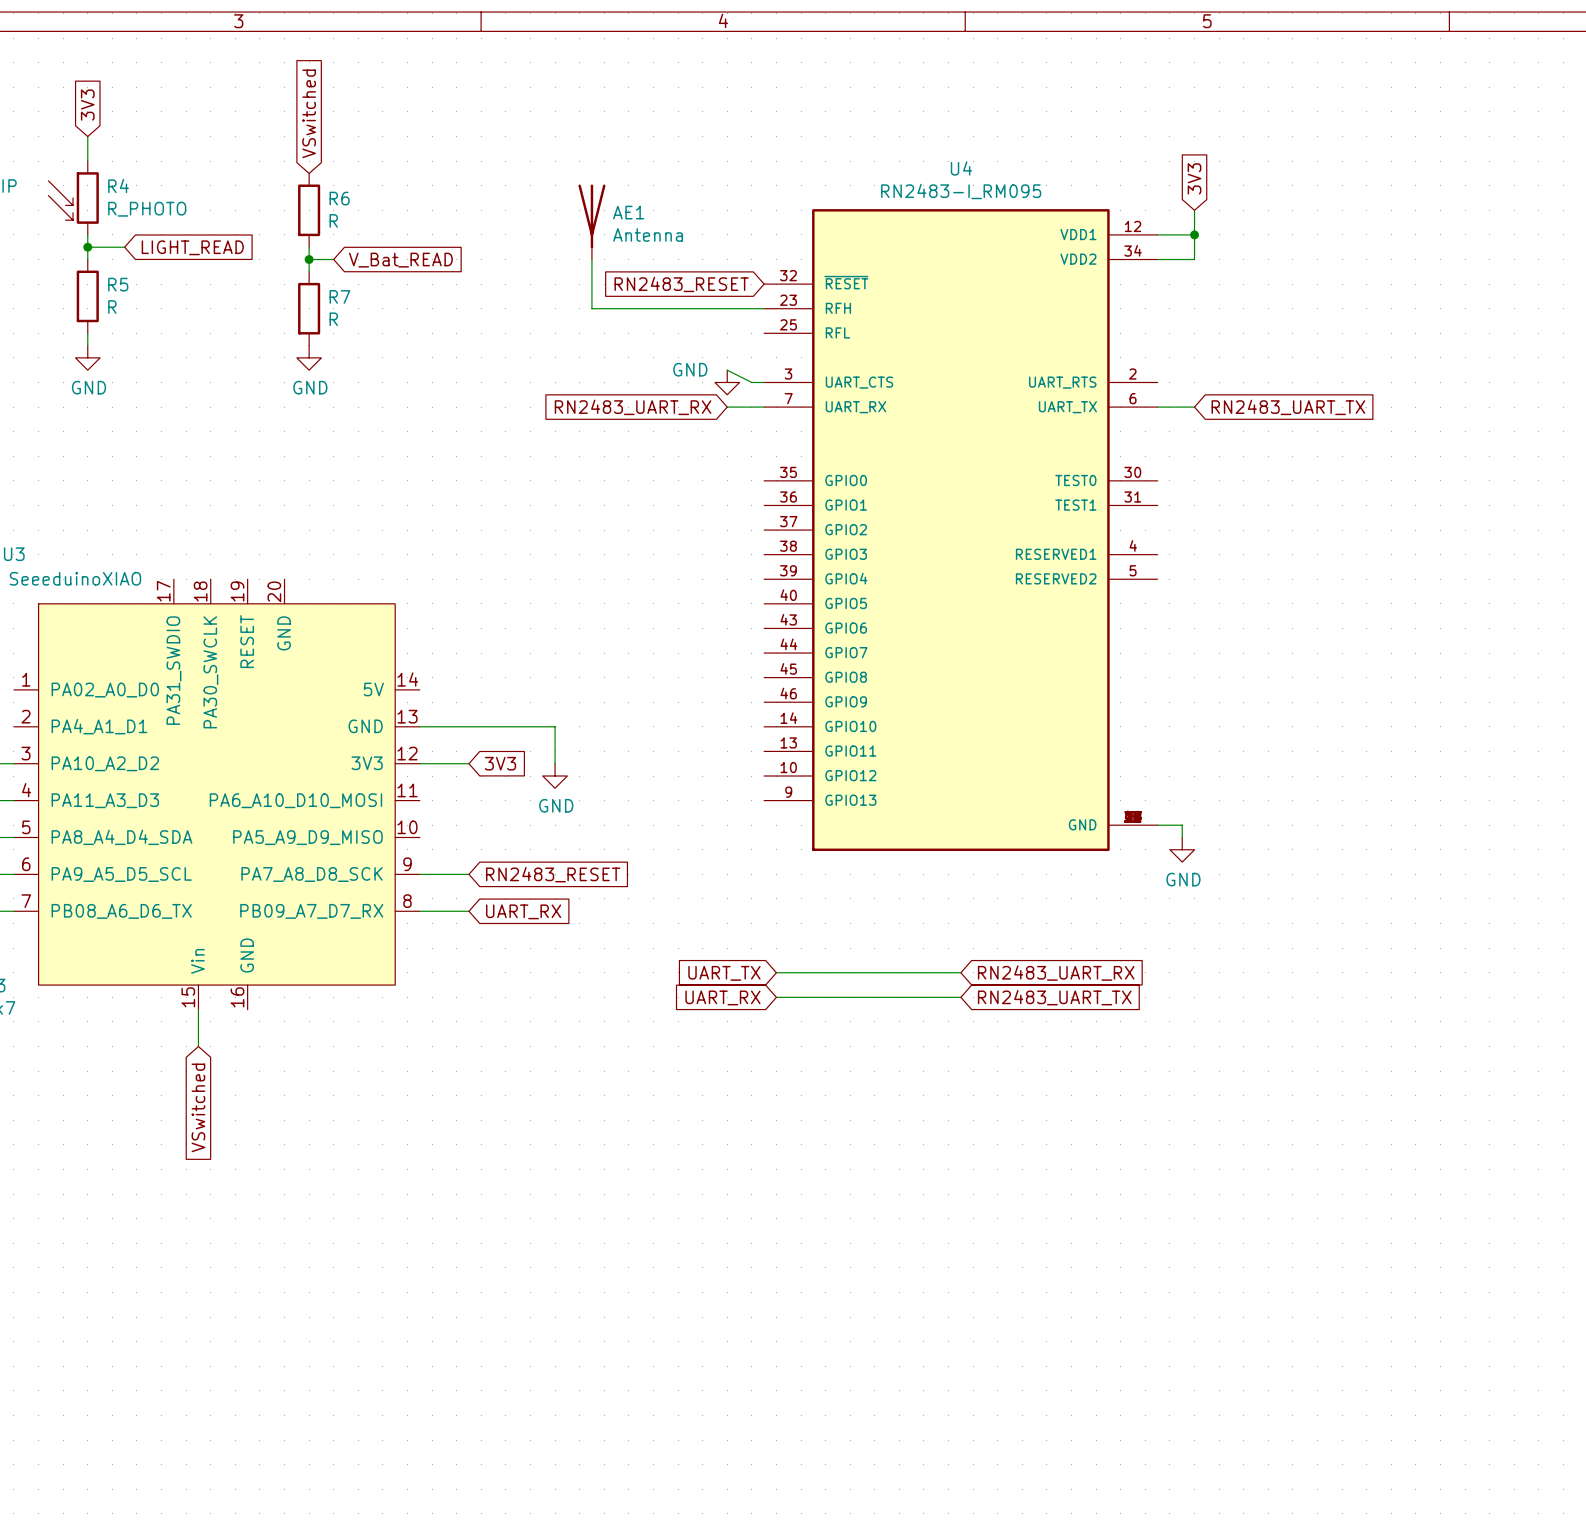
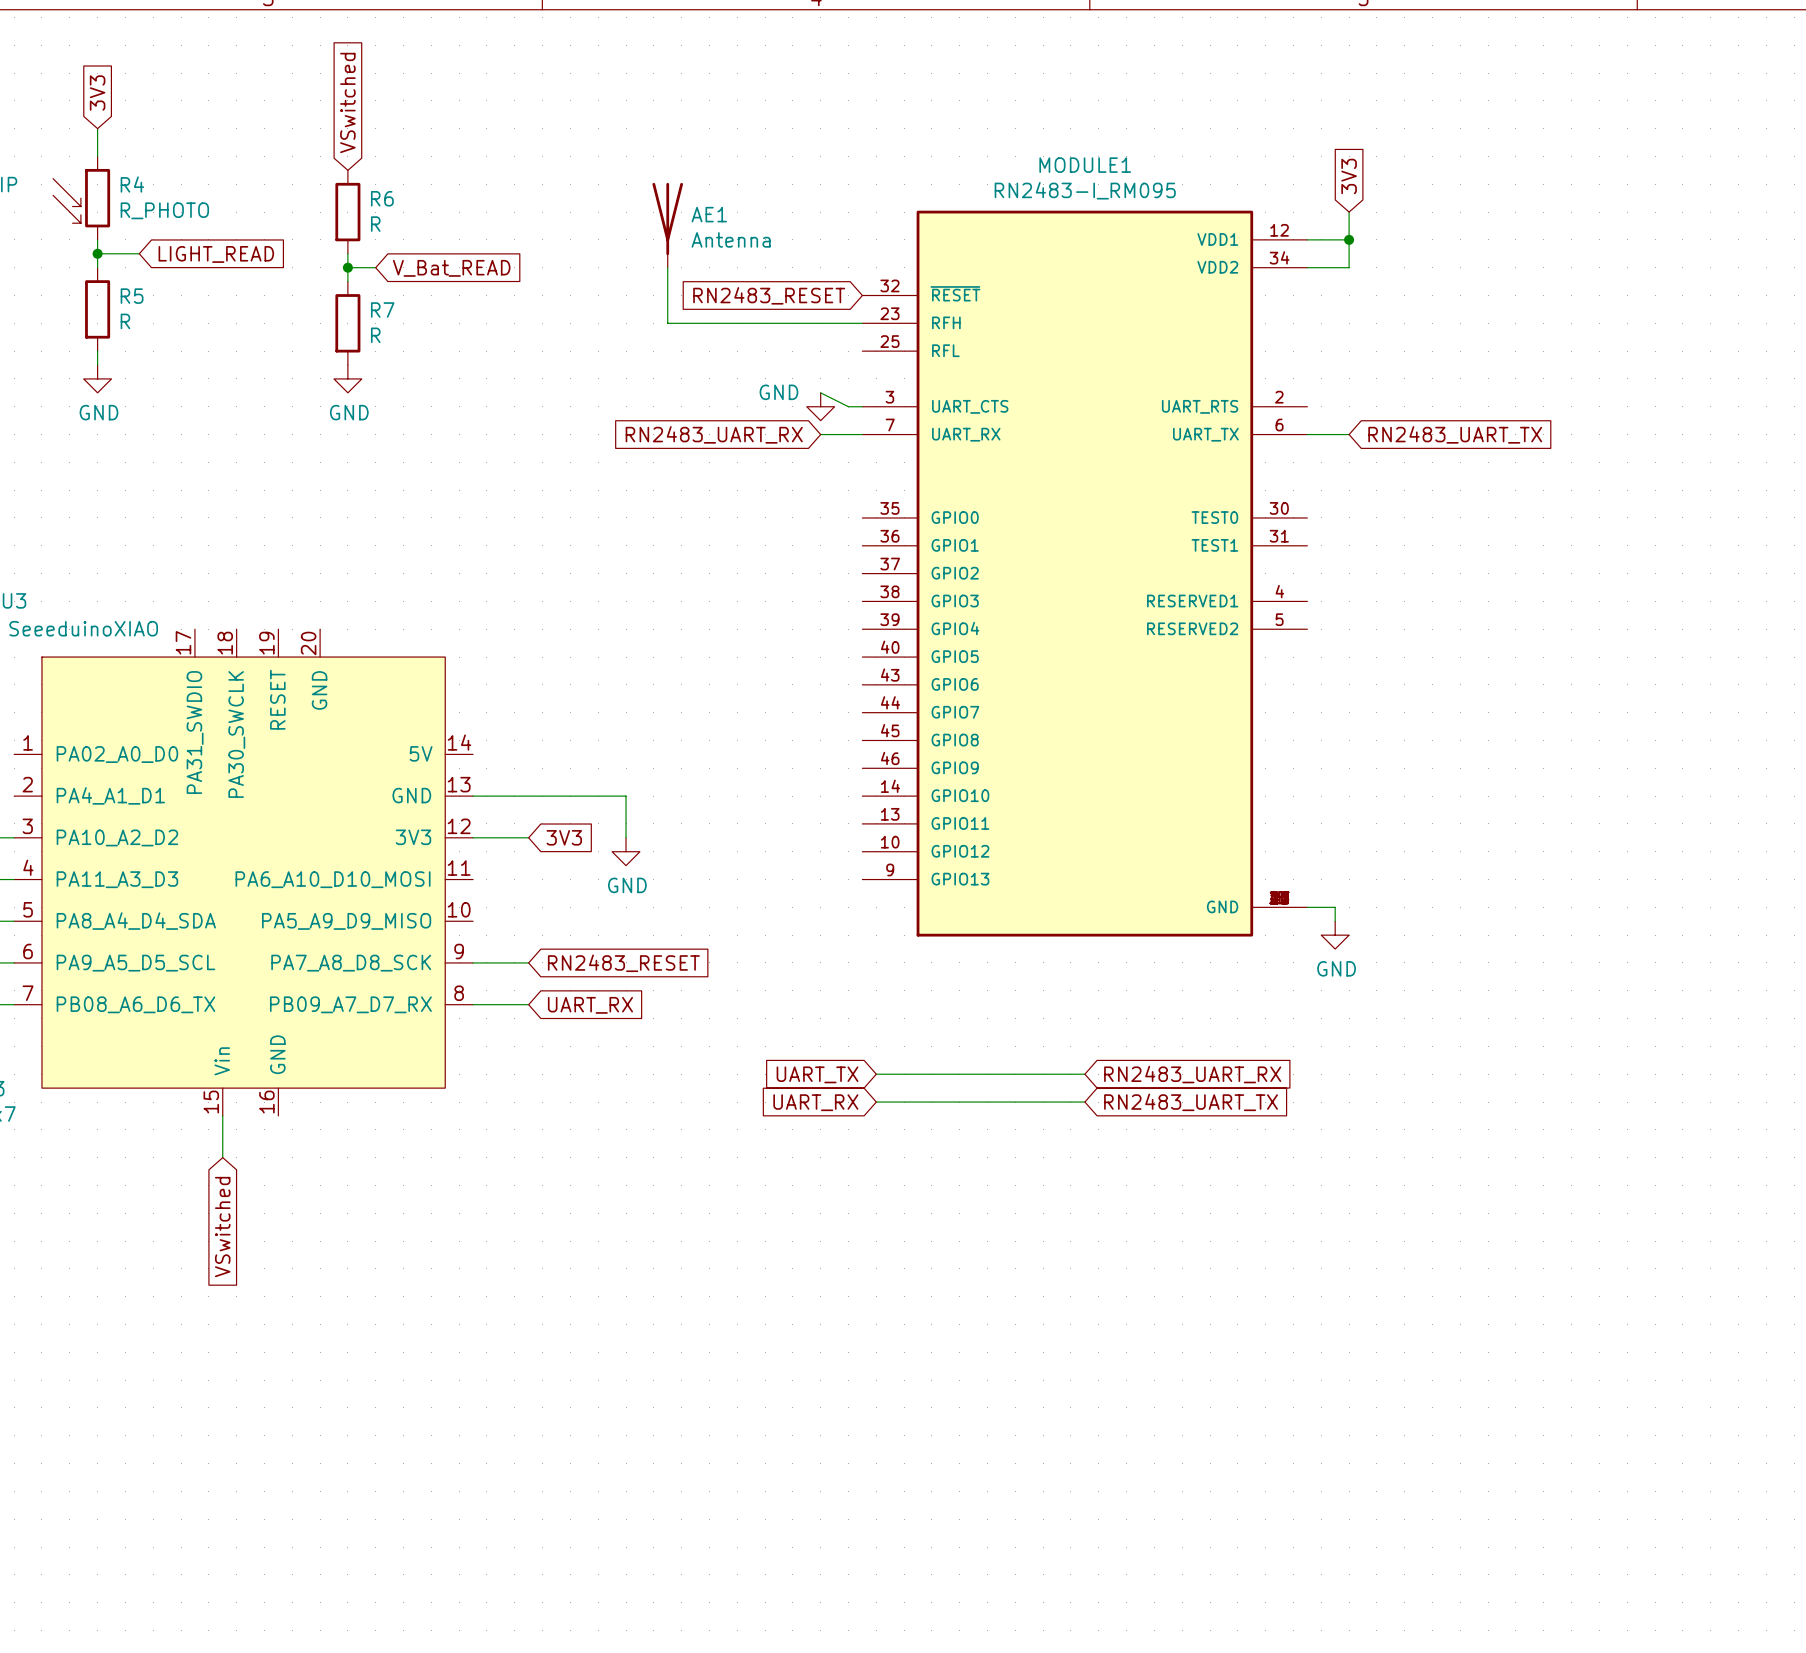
U4 name: U4 (961, 168) -> MODULE1 (1085, 165)

